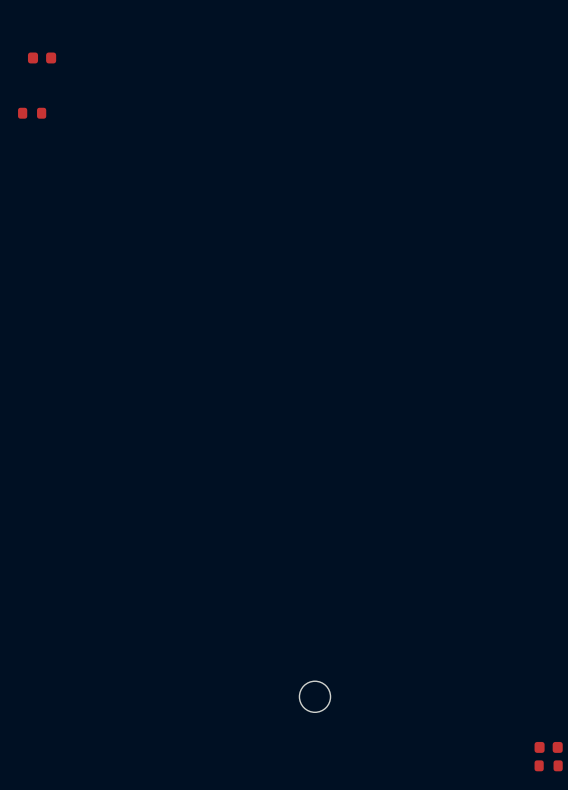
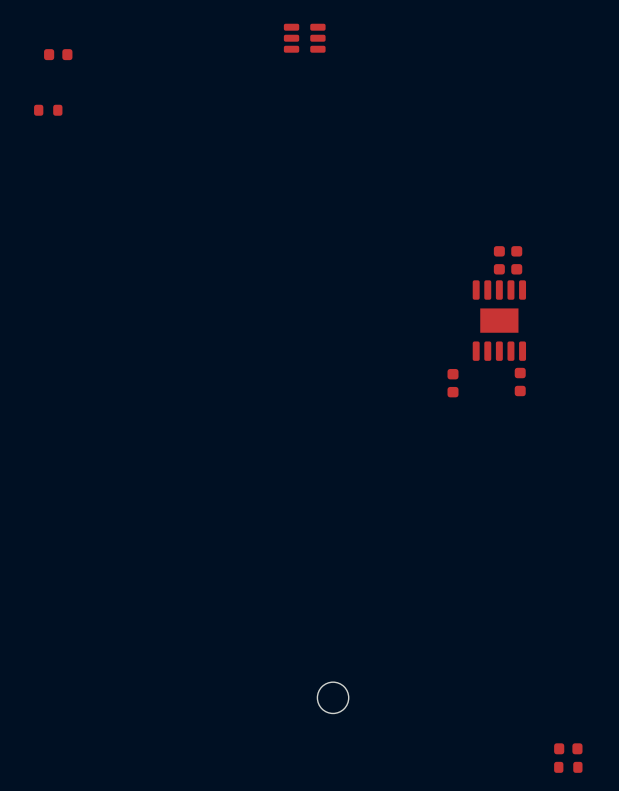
part: none -> (304, 38)
part: none -> (499, 260)
part: none -> (516, 260)
part: none -> (499, 320)
part: none -> (520, 382)
part: none -> (453, 383)

